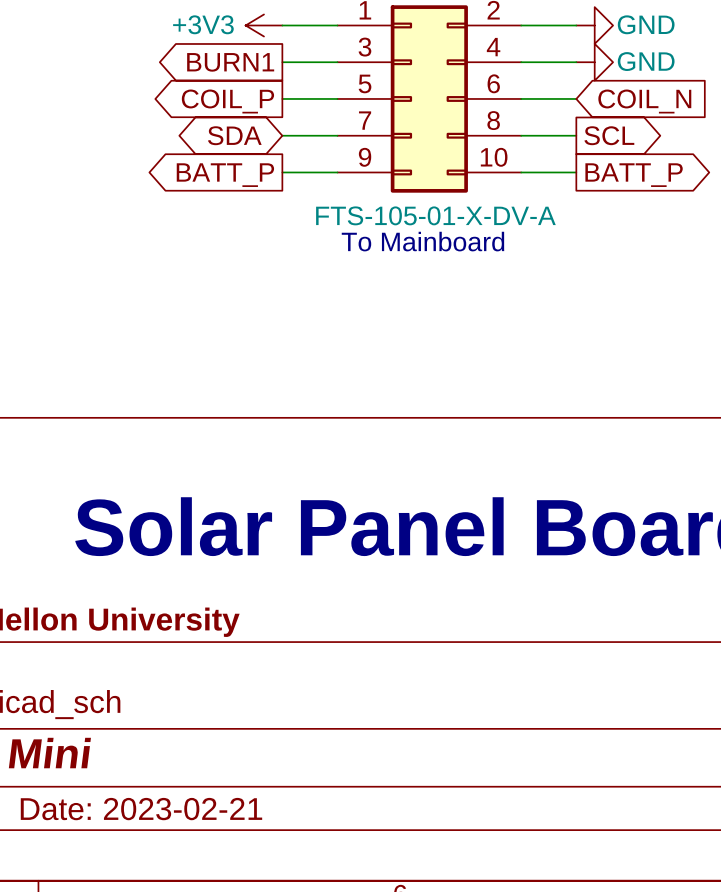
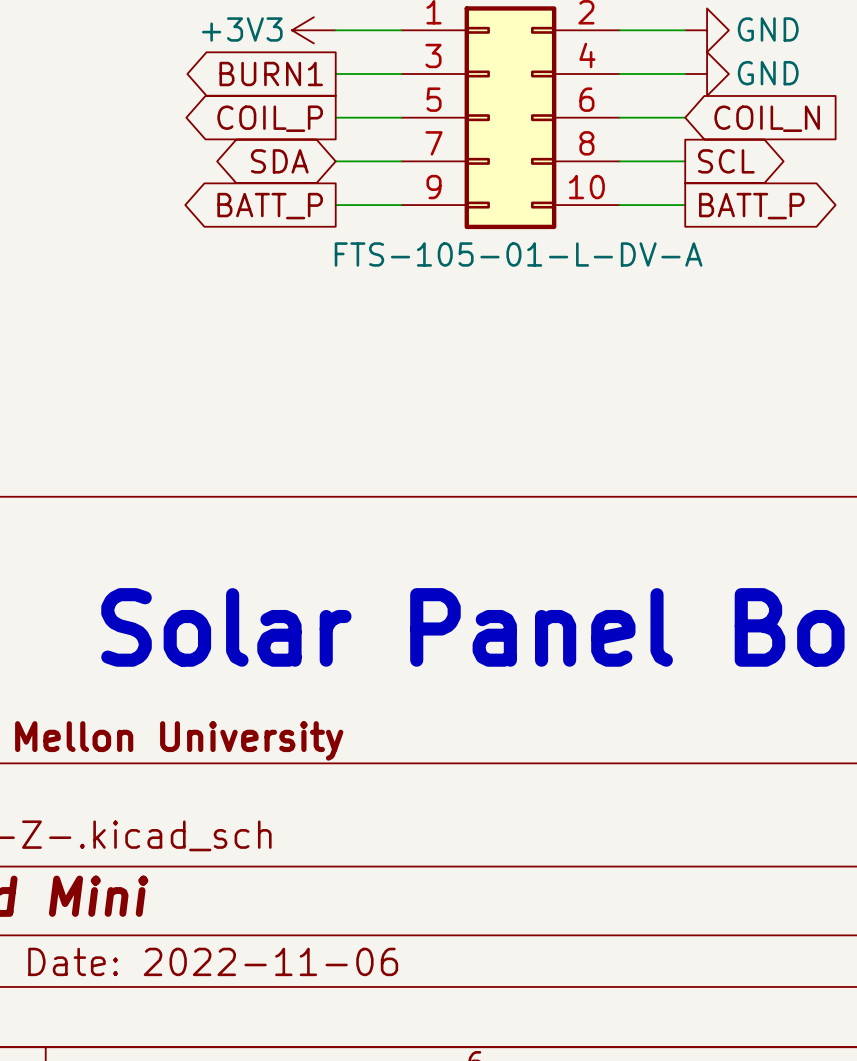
part value: FTS-105-01-X-DV-A (435, 215) -> FTS-105-01-L-DV-A (518, 254)
text: To Mainboard (422, 241) -> none
title block: Date: 2023-02-21 (141, 809) -> Date: 2022-11-06 (213, 961)

